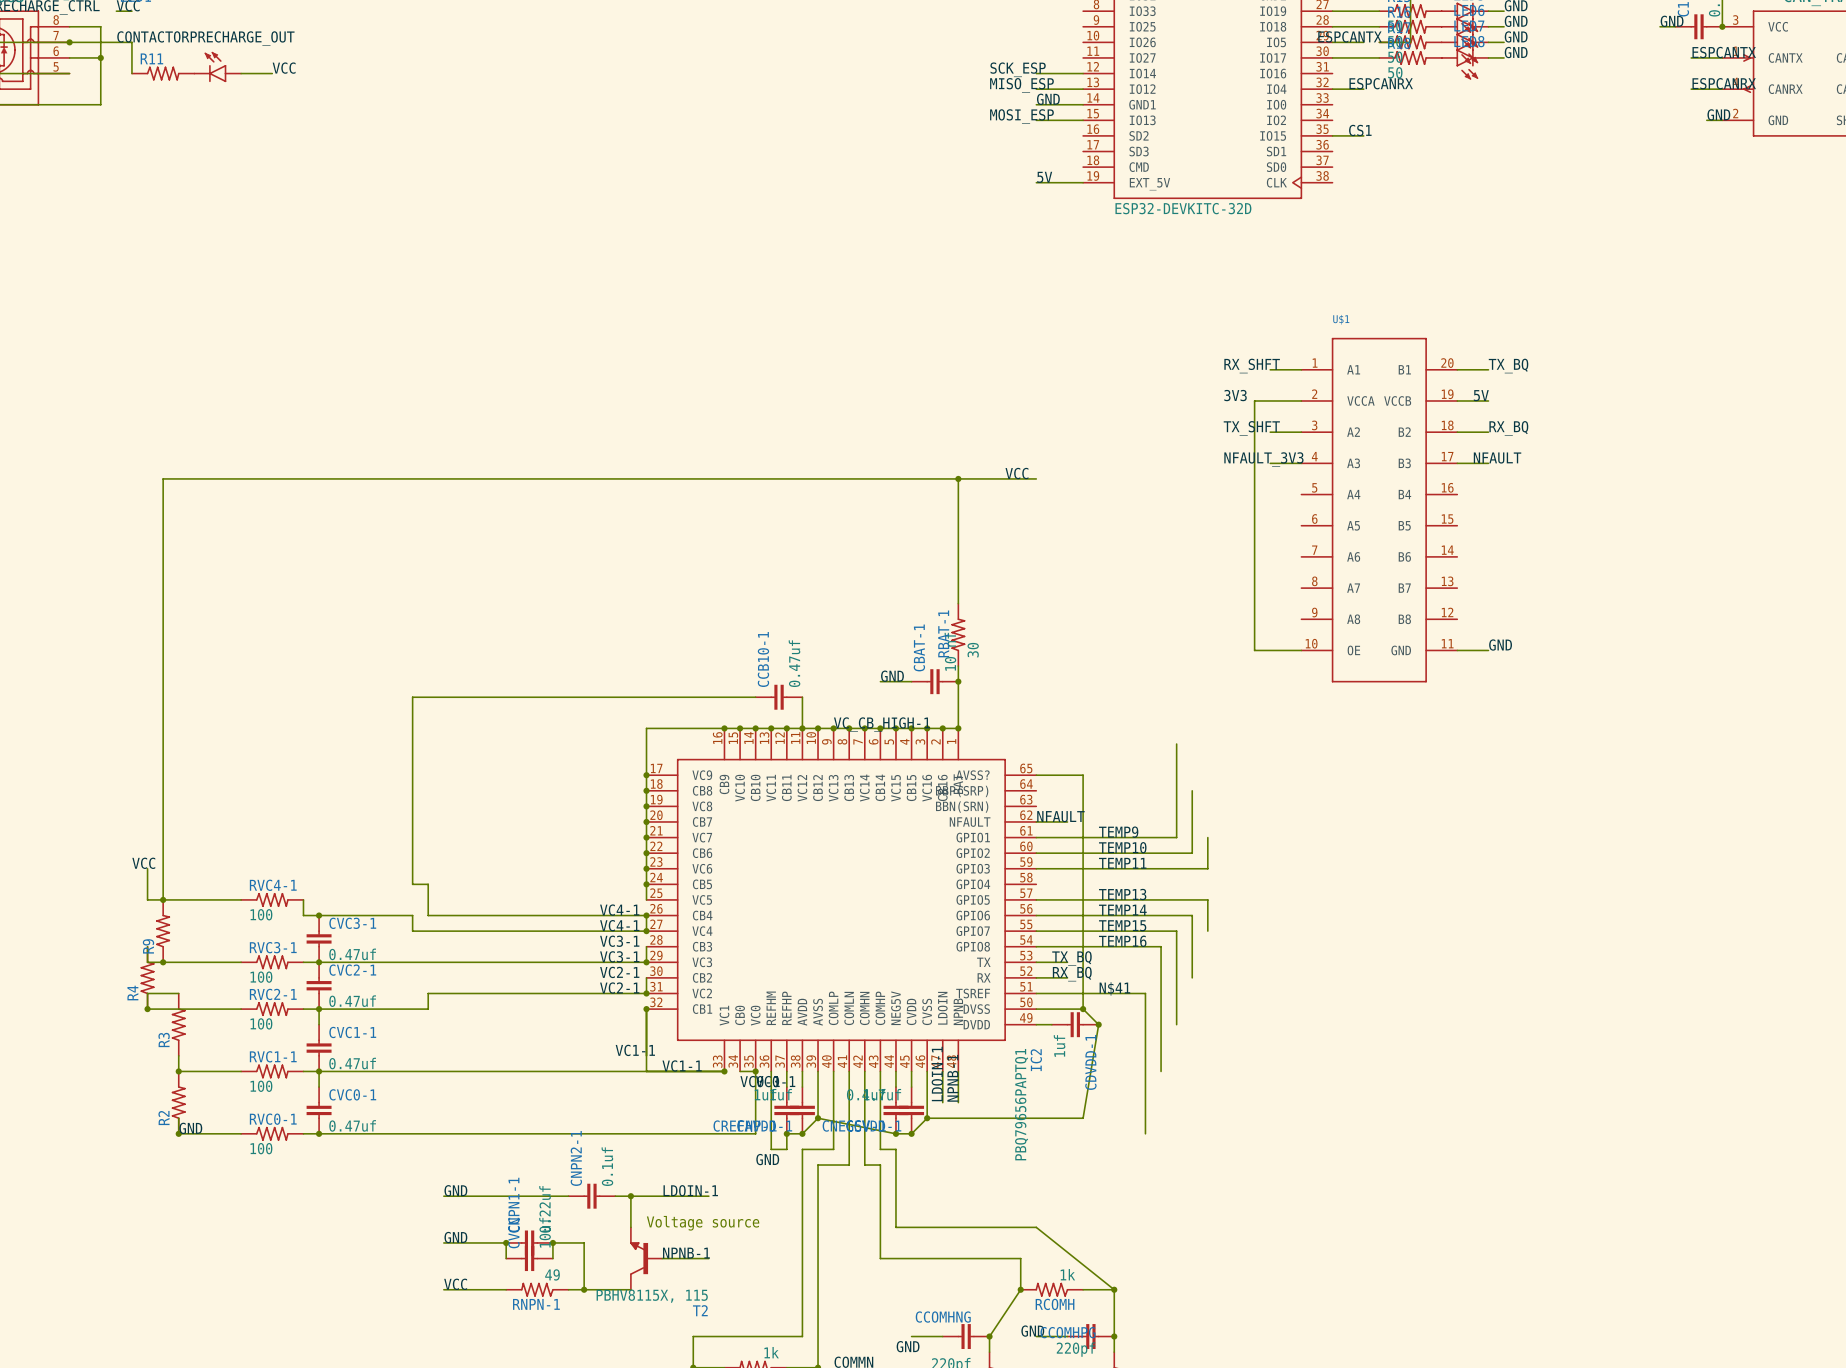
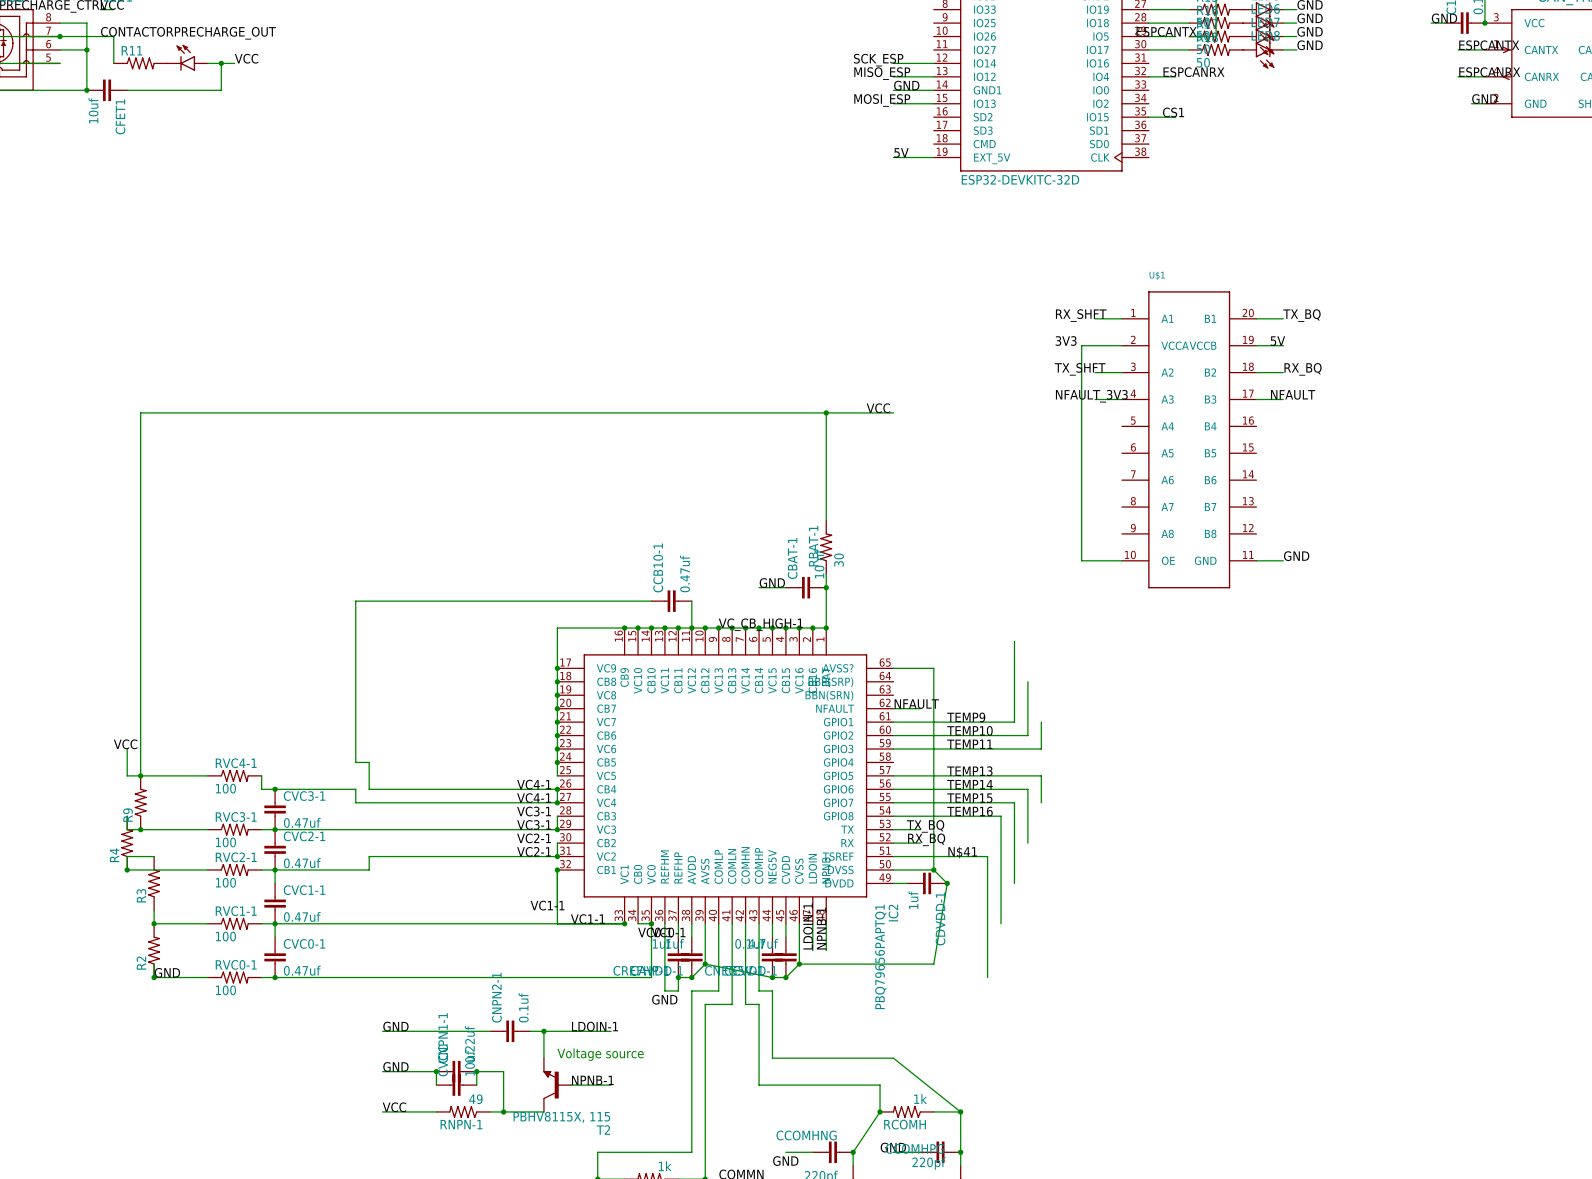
wire: none -> (221, 63) (221, 90) (127, 90)
junction: none -> (221, 63)
junction: none -> (86, 90)
CFET1: none -> 10uf (107, 90)

